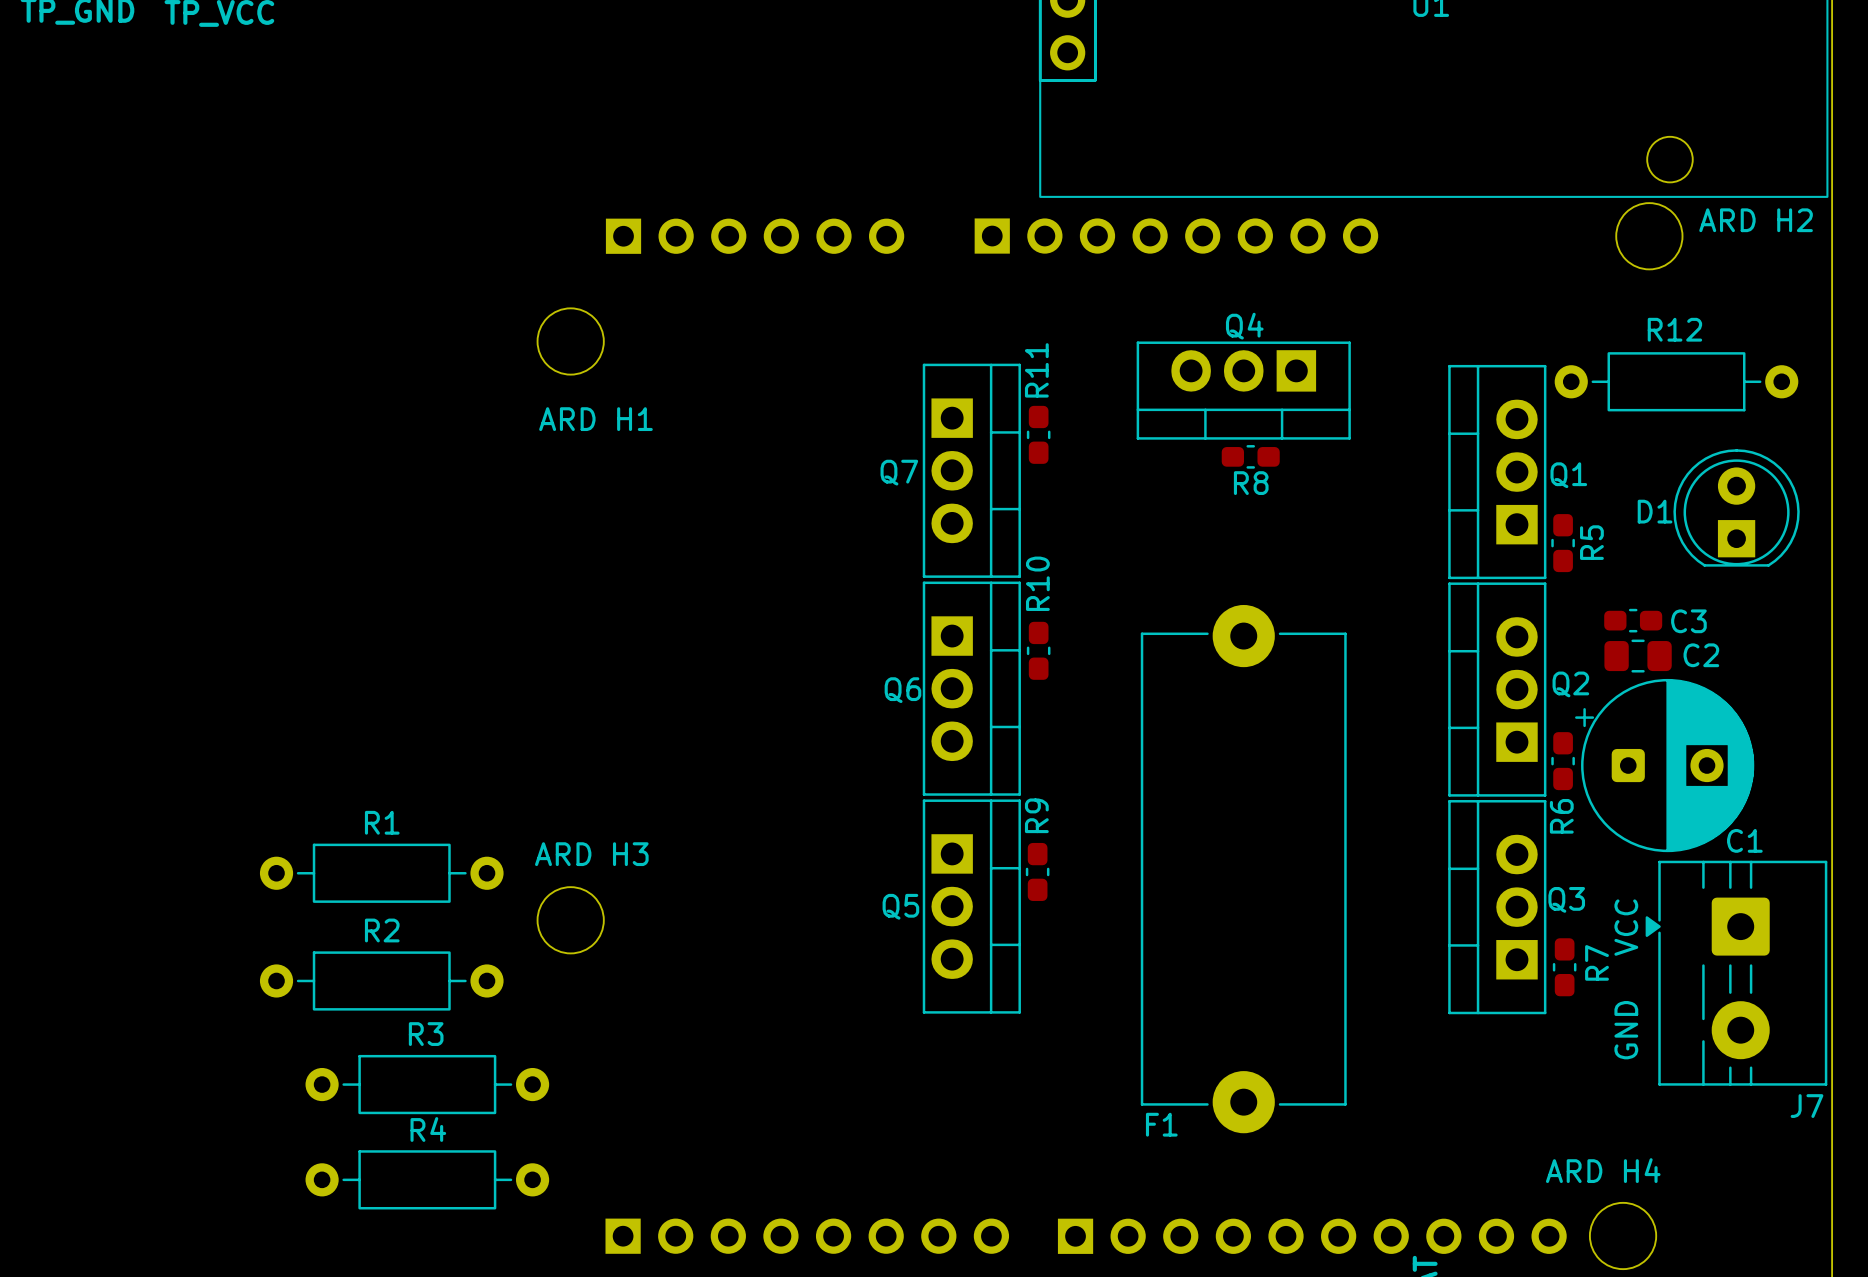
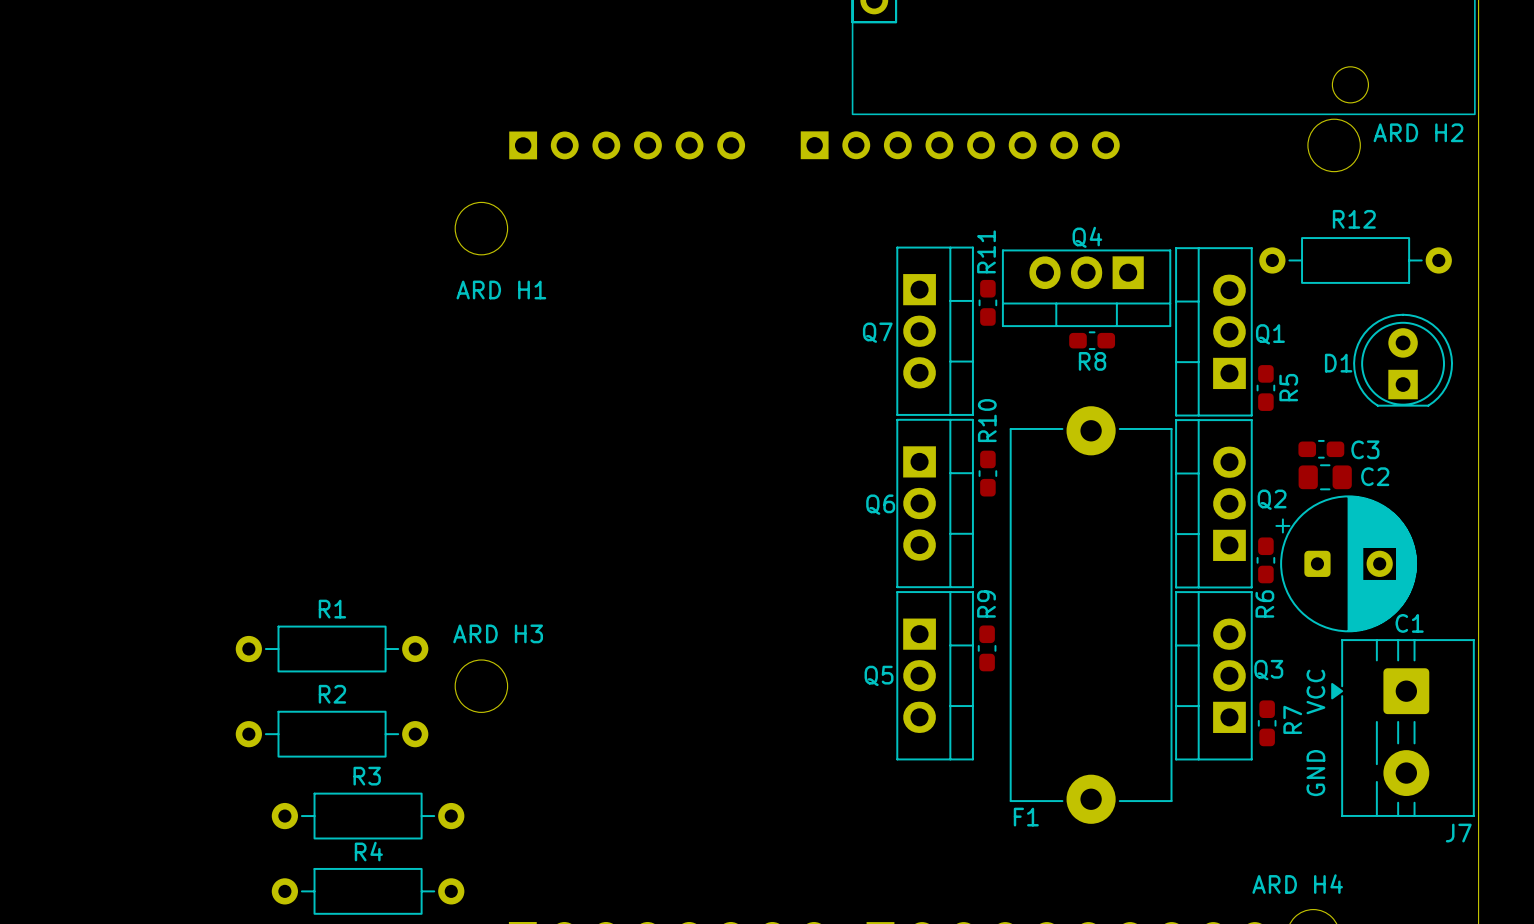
Q4 position: (1243, 390) -> (1086, 288)
R11 position: (1038, 434) -> (987, 302)
R8 position: (1250, 456) -> (1092, 340)
Q7 position: (971, 470) -> (935, 331)
R10 position: (1038, 650) -> (987, 473)
Q6 position: (971, 688) -> (935, 503)
F1 position: (1243, 869) -> (1091, 615)
R9 position: (1037, 871) -> (987, 648)
Q5 position: (971, 906) -> (935, 675)

